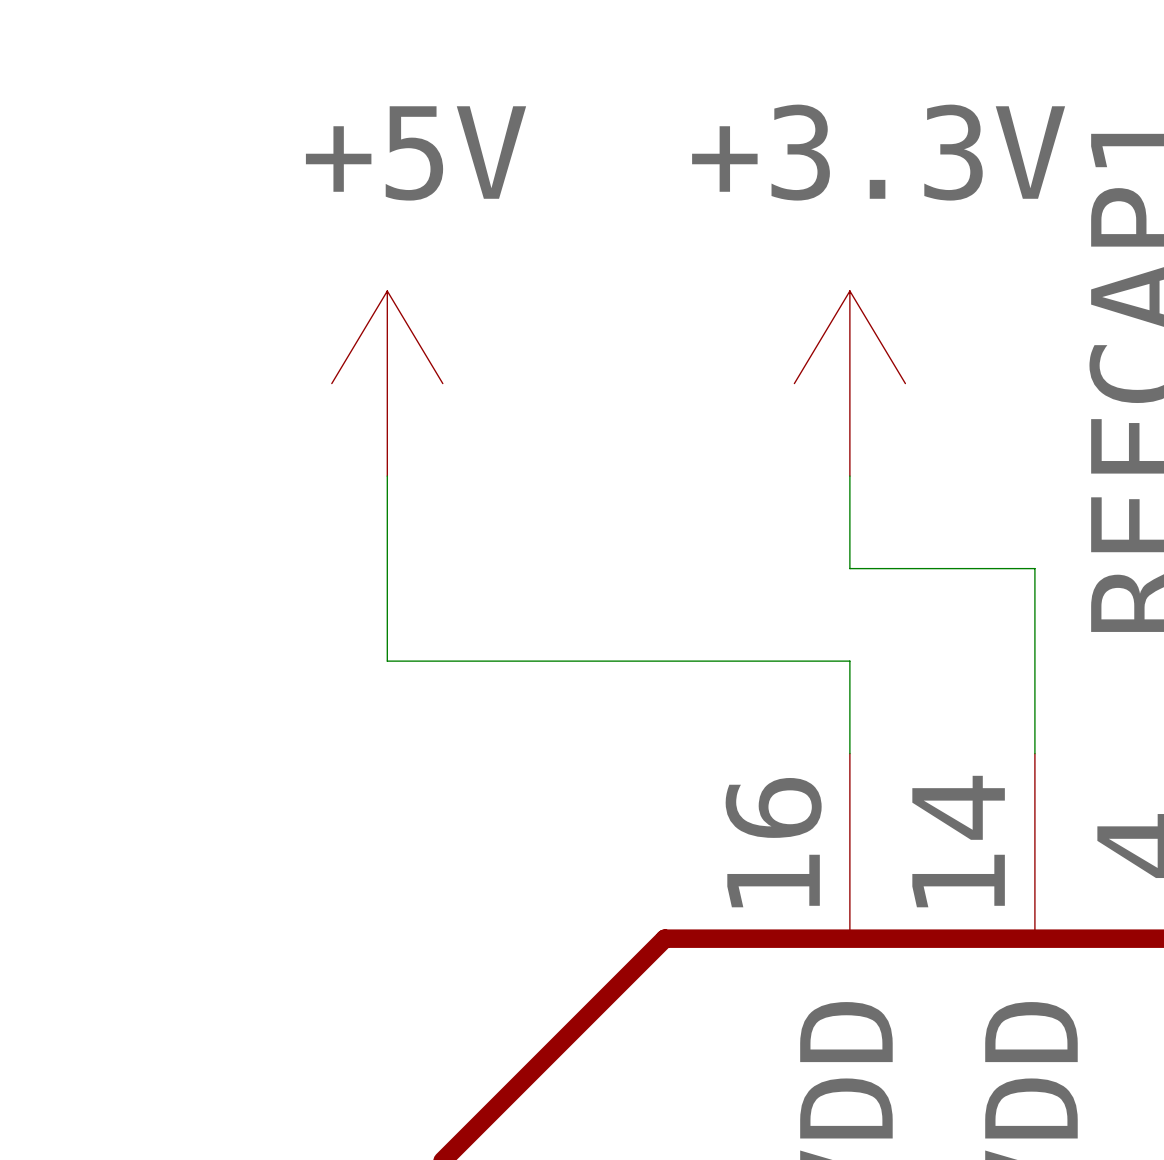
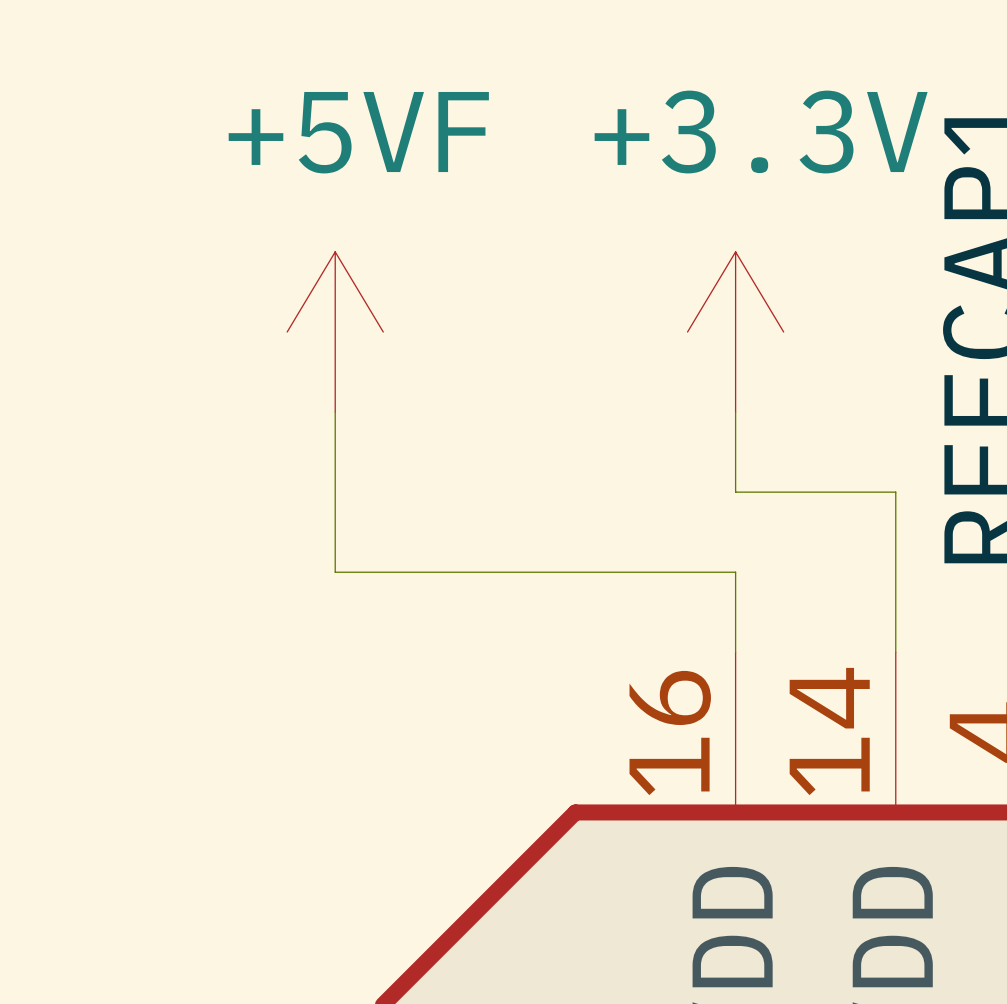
power symbol: +5V (387, 383) -> +5VF (335, 331)

